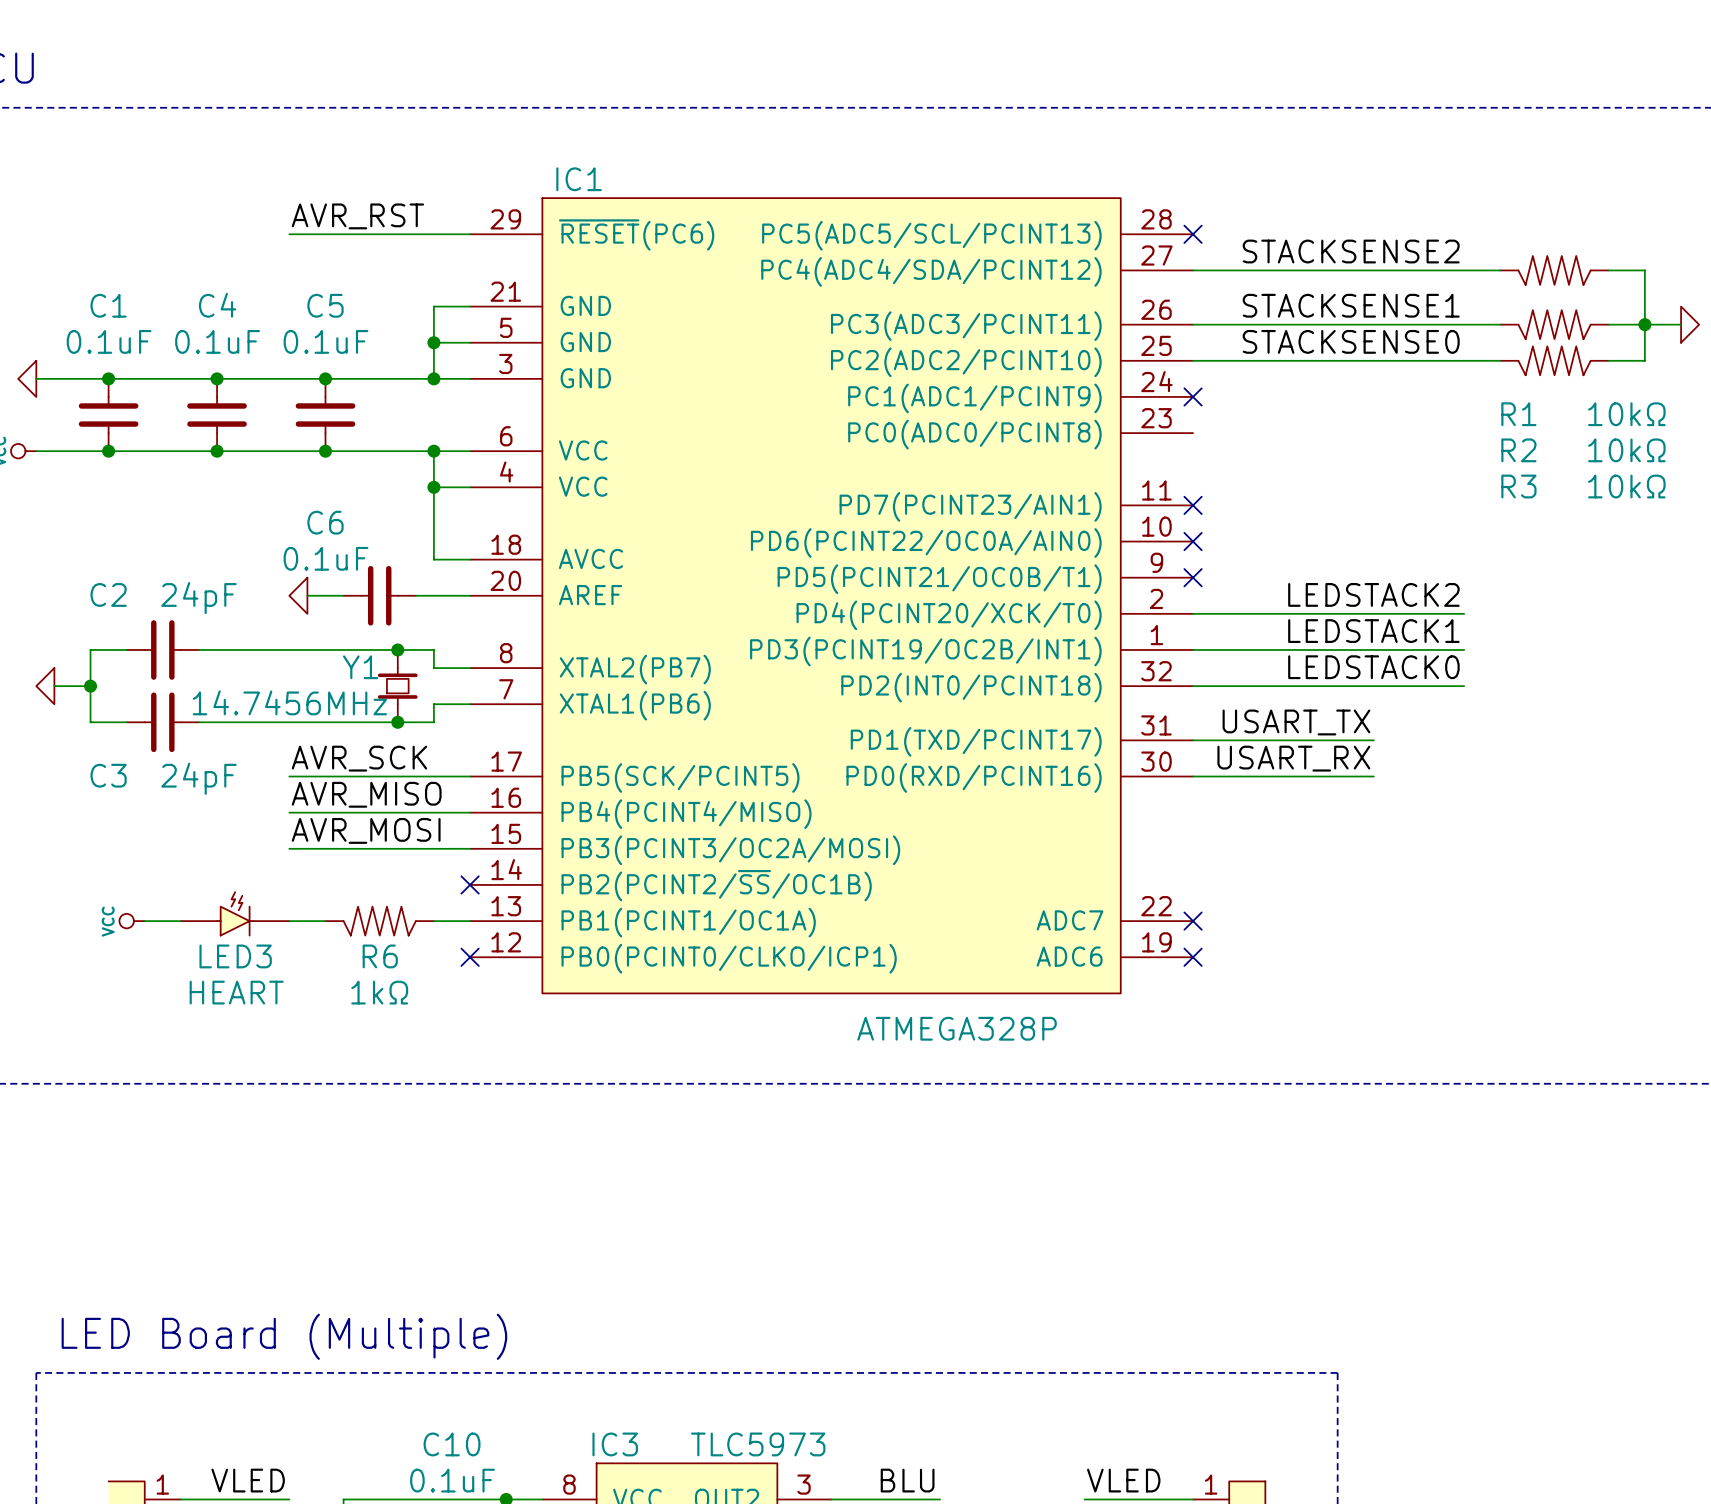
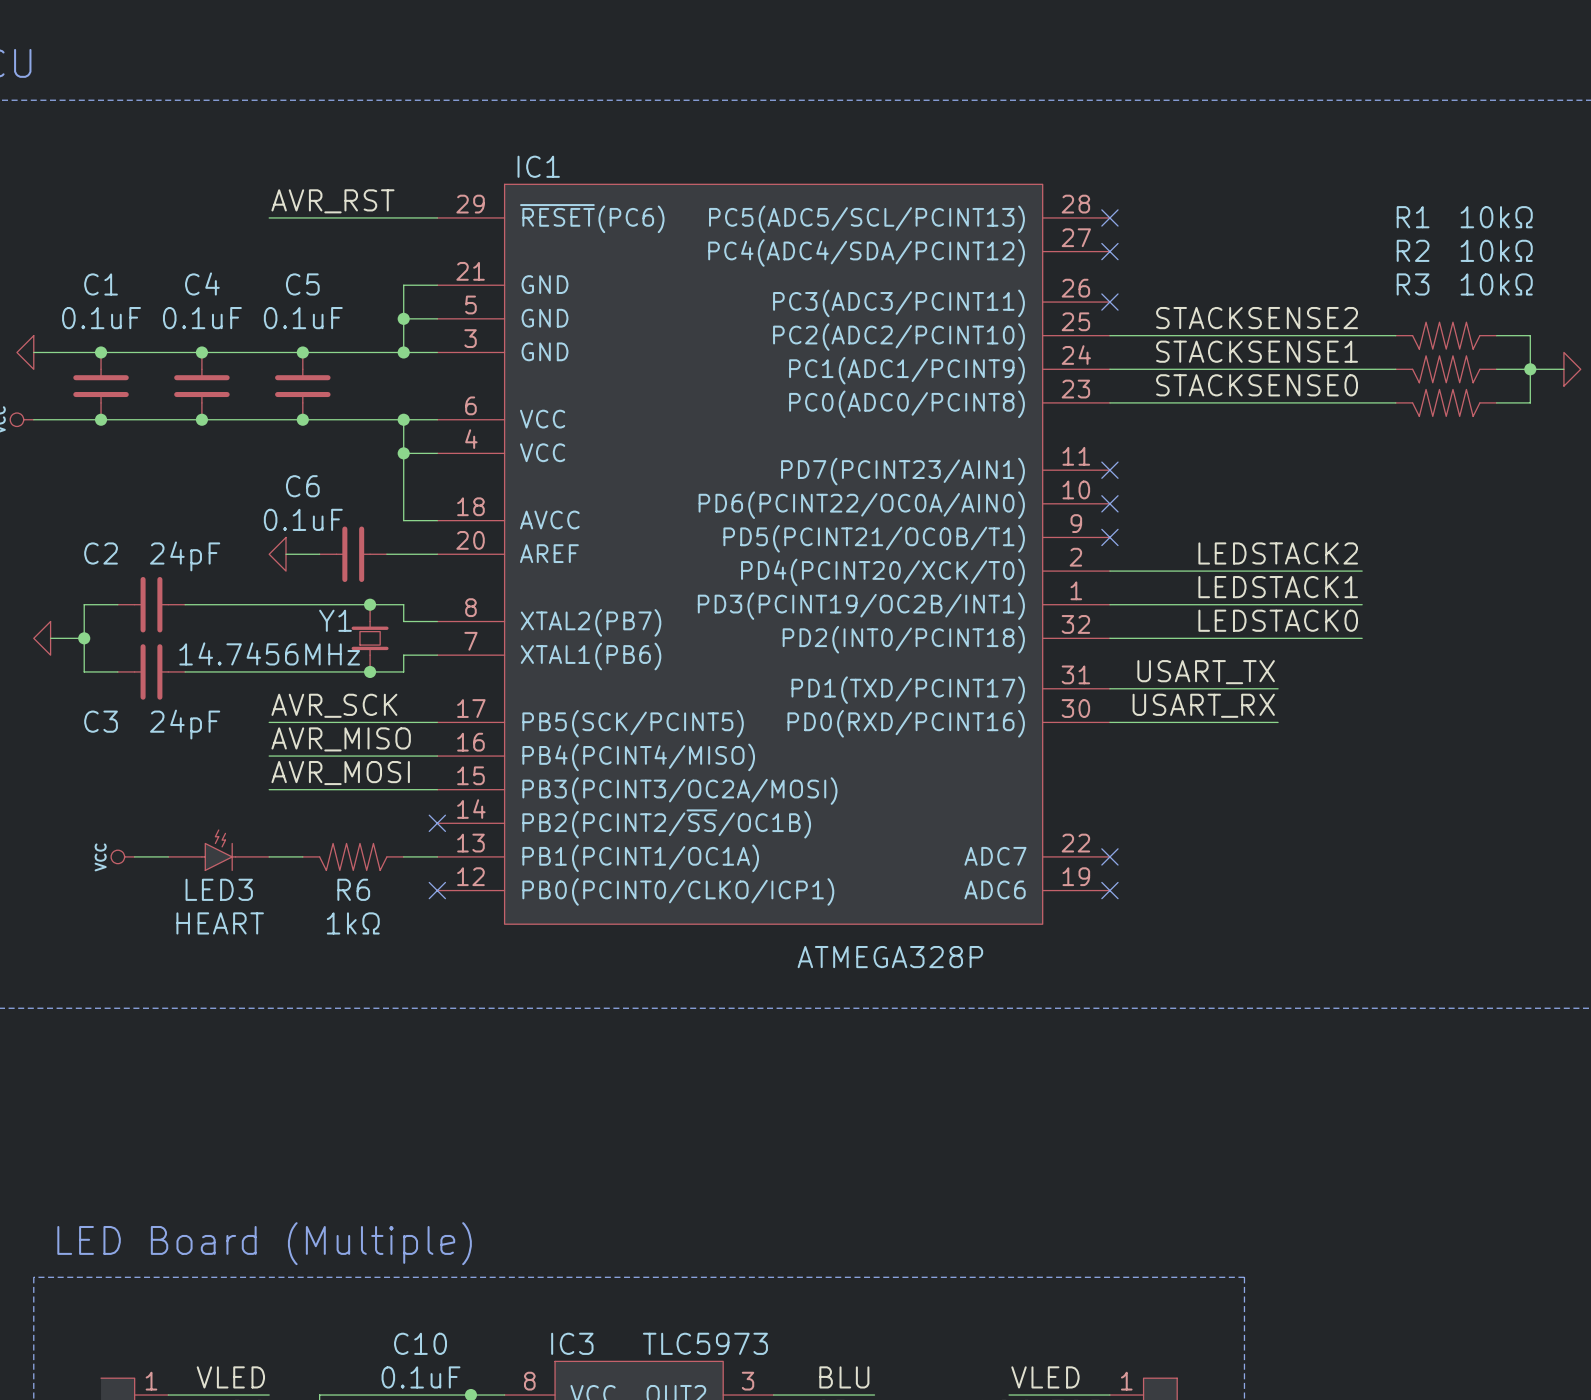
label: STACKSENSE2 (1351, 251) -> none
wire: (1193, 270) (1500, 270) -> (1109, 402) (1395, 402)
no-connect mark: none -> (1109, 251)
R1: 10kΩ (1554, 270) -> none
wire: (1608, 270) (1644, 270) (1644, 360) -> (1496, 402) (1530, 402) (1530, 335)
label position: STACKSENSE1 (1351, 305) -> STACKSENSE1 (1257, 351)
wire: (1193, 324) (1500, 324) -> (1109, 369) (1395, 369)
no-connect mark: none -> (1109, 302)
R2 position: (1554, 324) -> (1446, 369)
wire: (1608, 324) (1681, 324) -> (1496, 369) (1563, 369)
junction position: (1644, 324) -> (1530, 369)
power symbol position: (1690, 324) -> (1572, 369)
label: STACKSENSE0 (1351, 341) -> STACKSENSE2 (1257, 318)
no-connect mark: (1193, 396) -> none
label: none -> STACKSENSE0 (1257, 385)
R3: none -> 10kΩ (1446, 402)
R2 name position: R2 (1518, 450) -> R2 (1413, 250)
R2 value position: 10kΩ (1626, 450) -> 10kΩ (1496, 250)
R3 name: R3 (1518, 486) -> R1 (1413, 217)
R3 value position: 10kΩ (1626, 486) -> 10kΩ (1496, 217)

